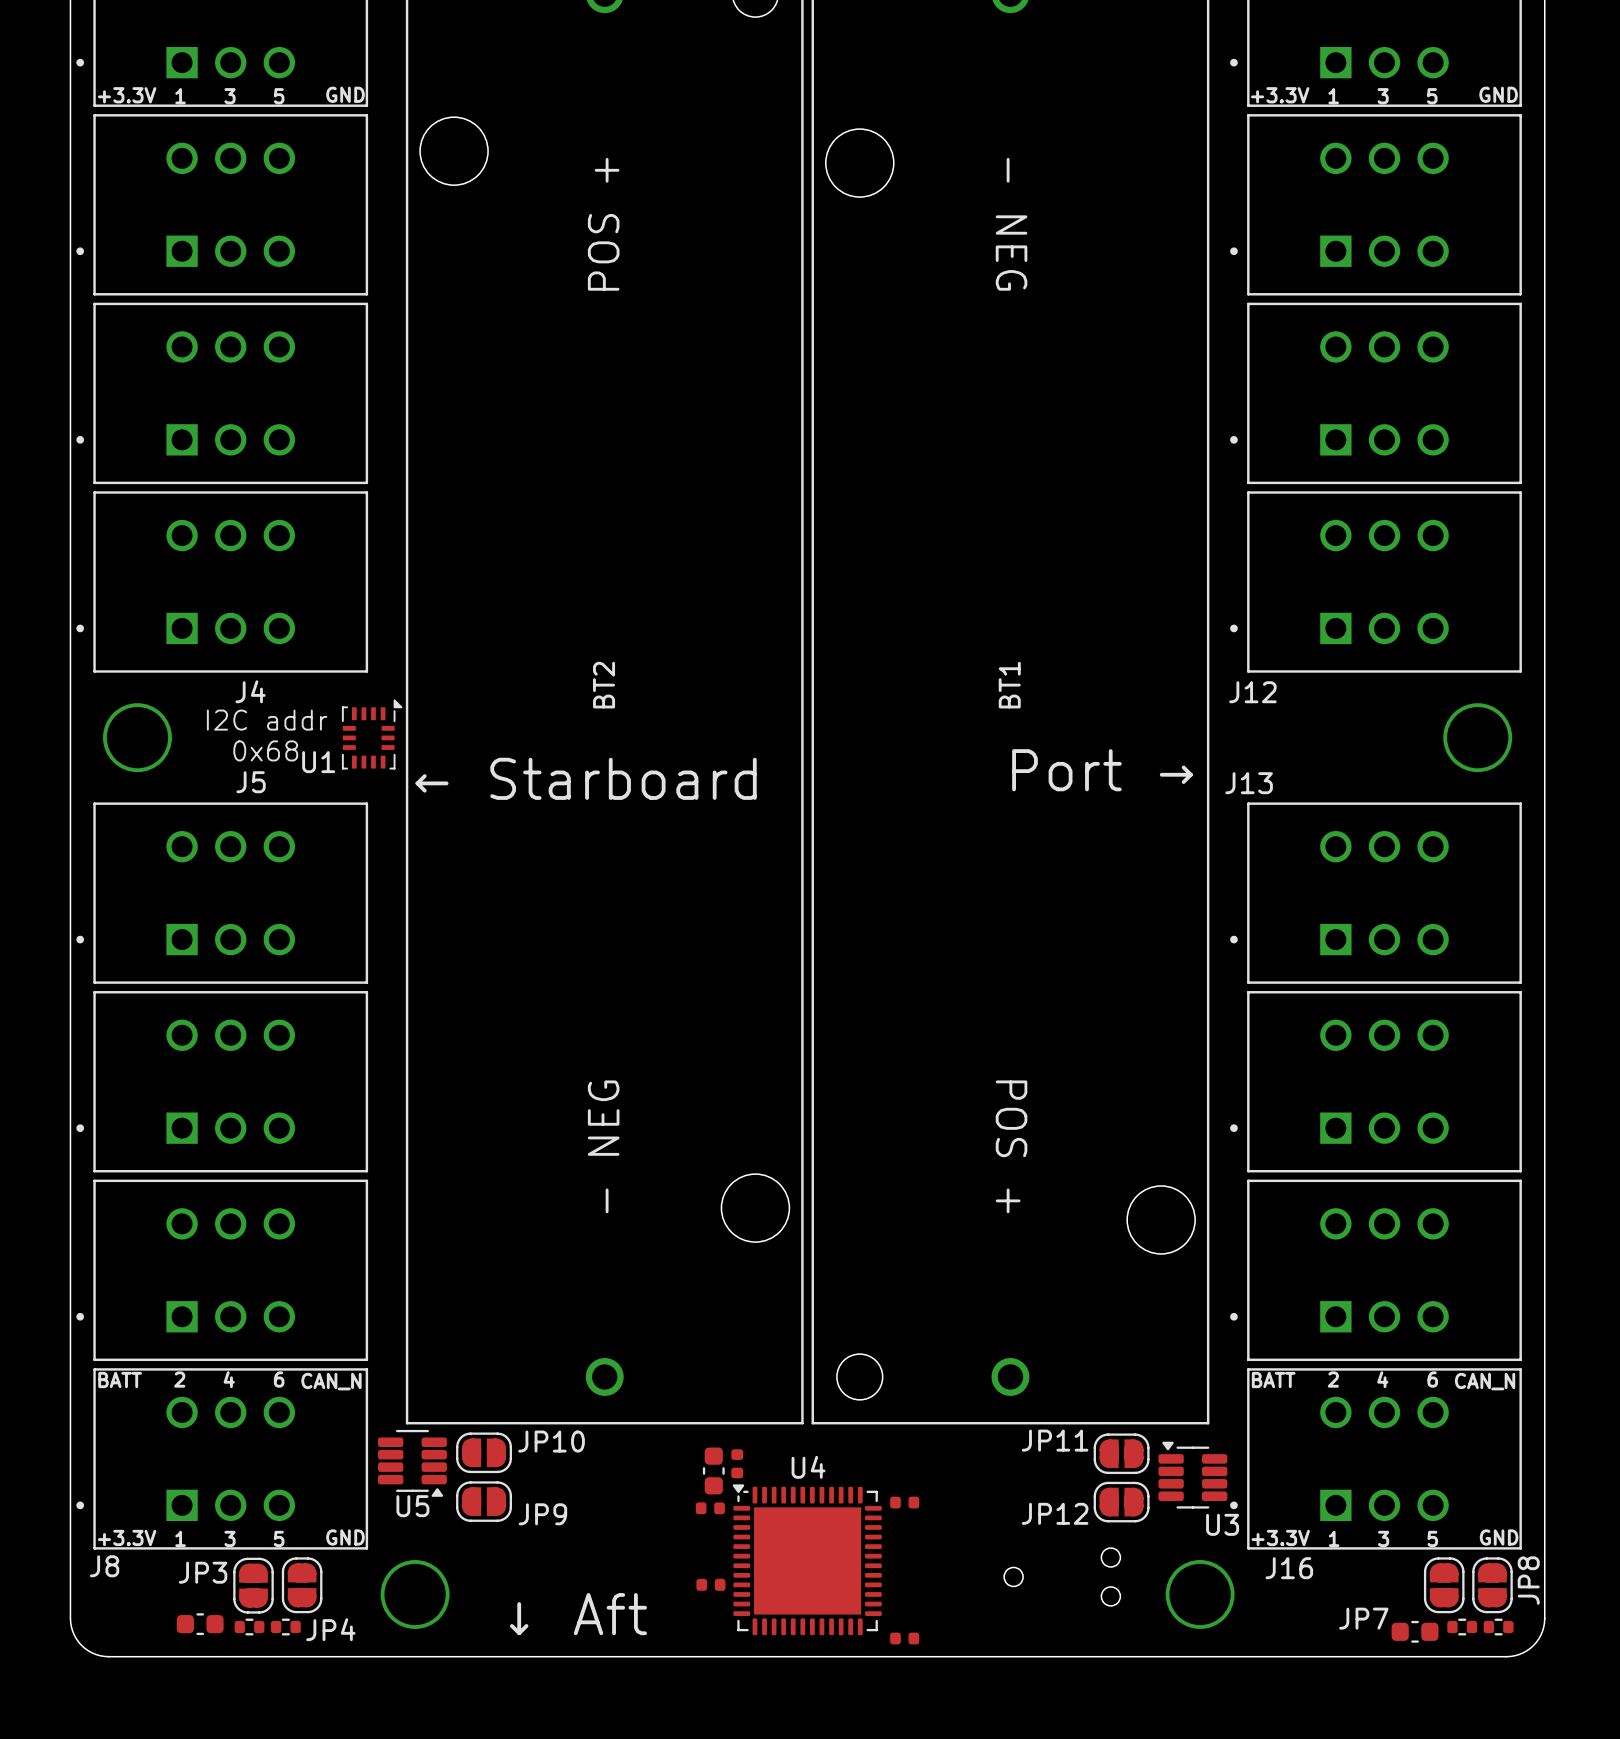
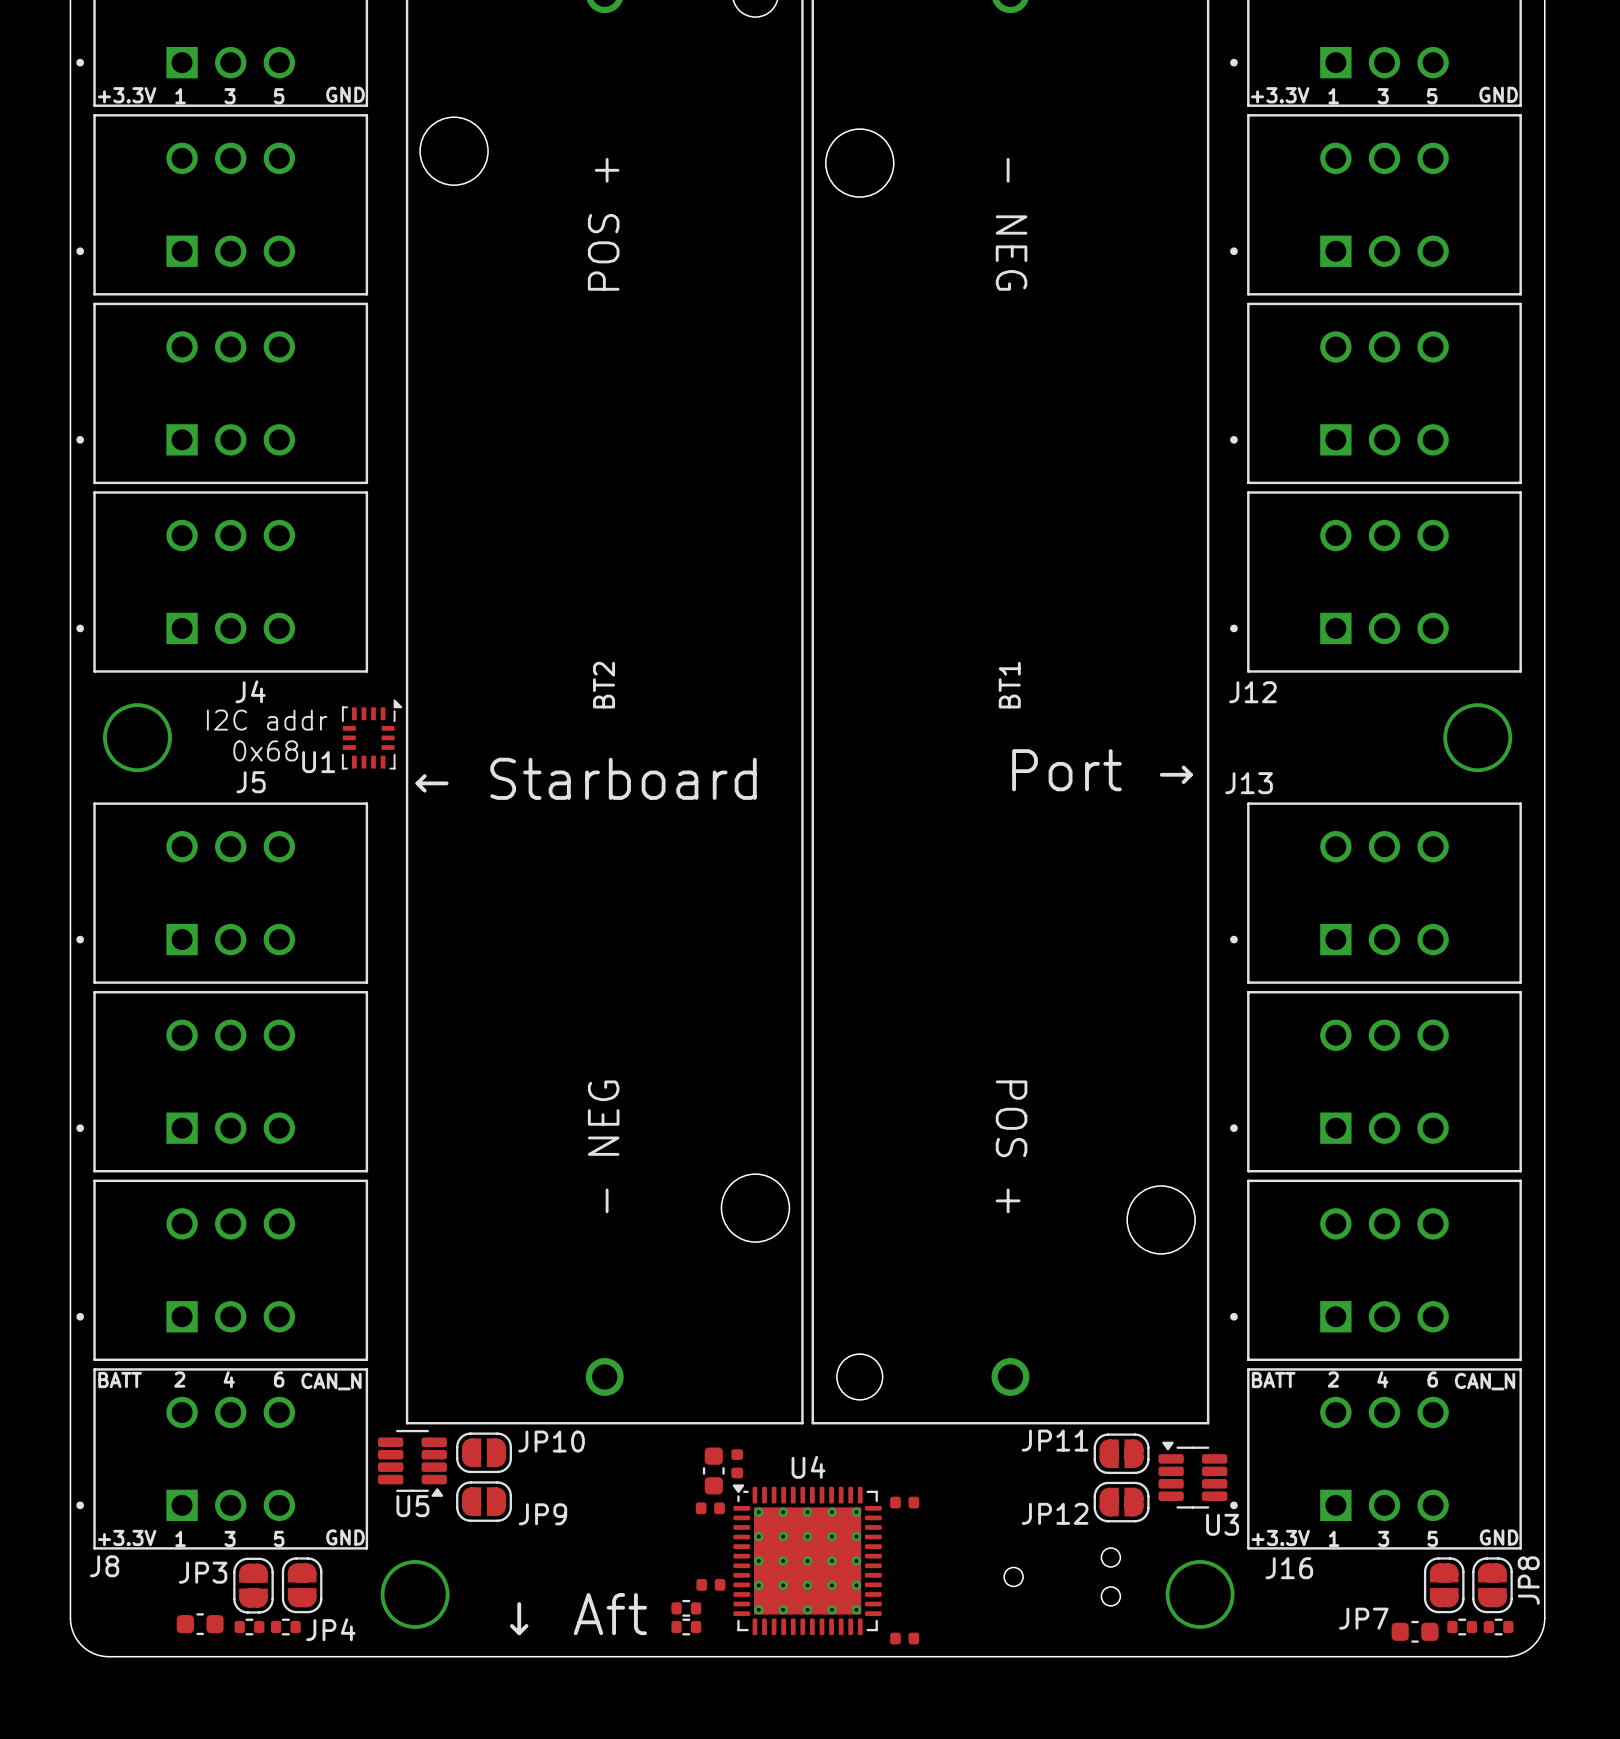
U4 footprint: [732, 1484, 882, 1636] -> [732, 1484, 882, 1636]
part: none -> (686, 1608)
part: none -> (686, 1627)

